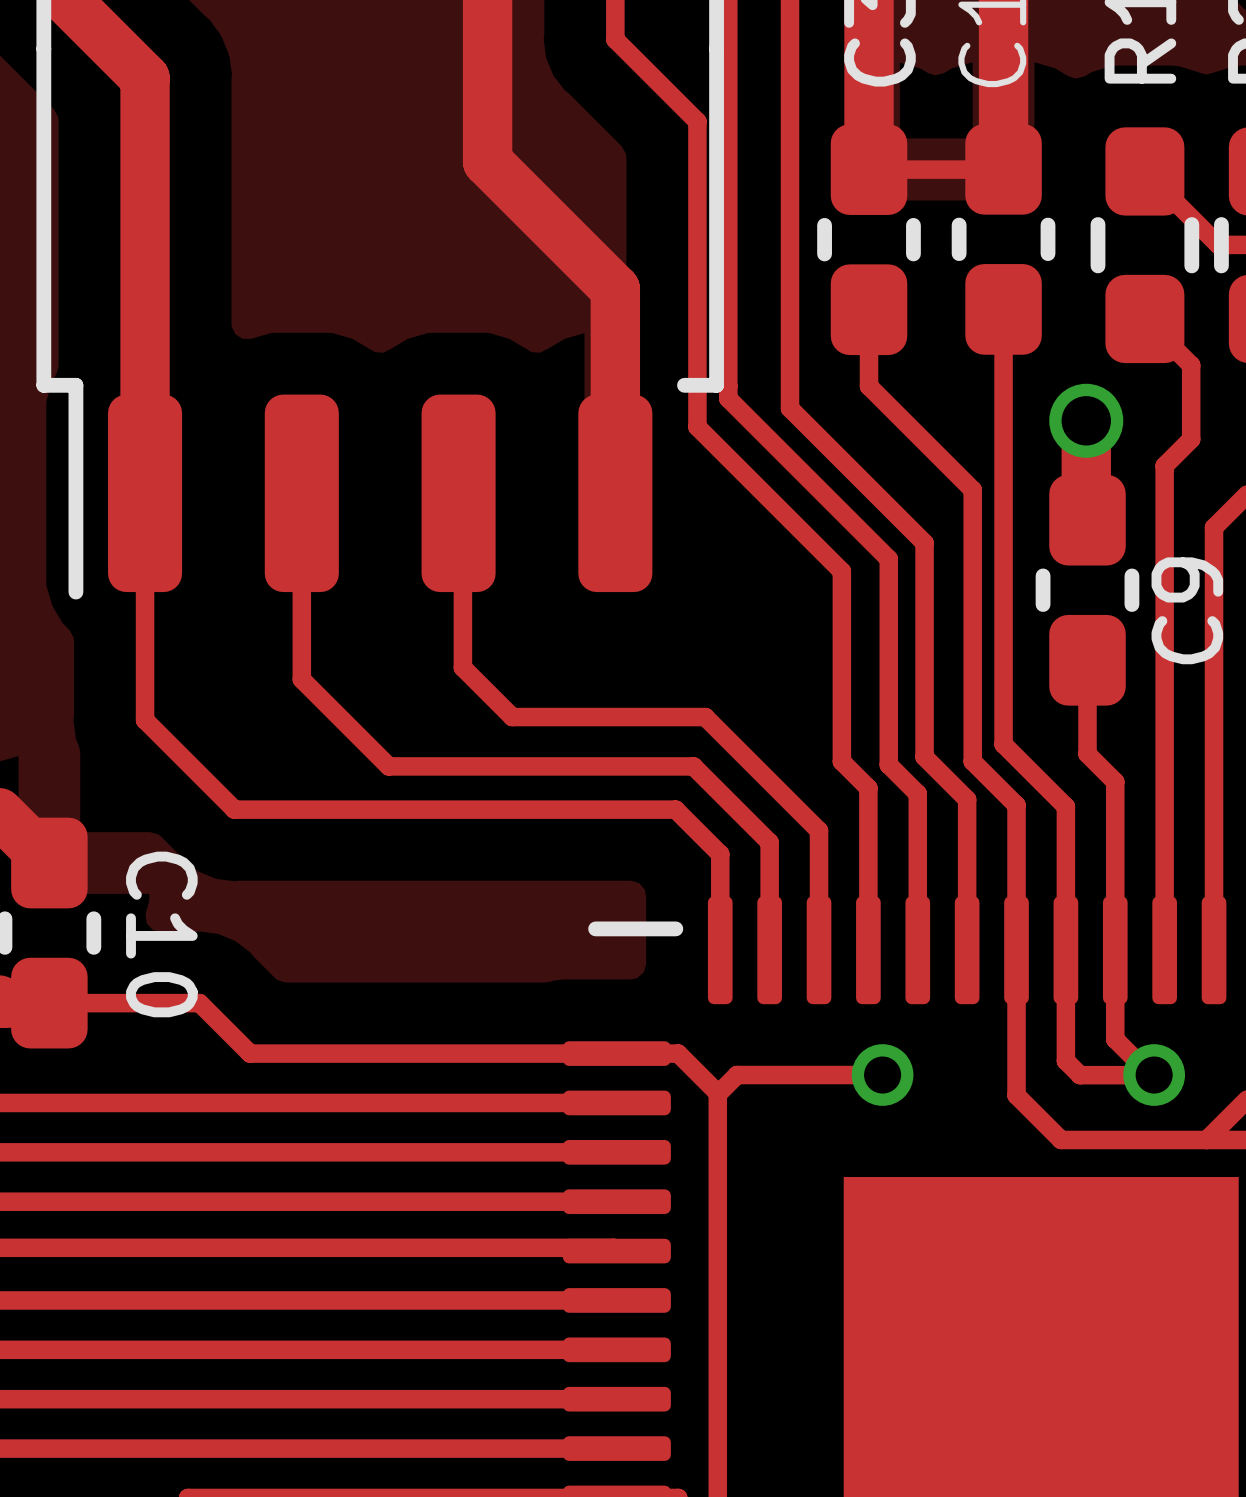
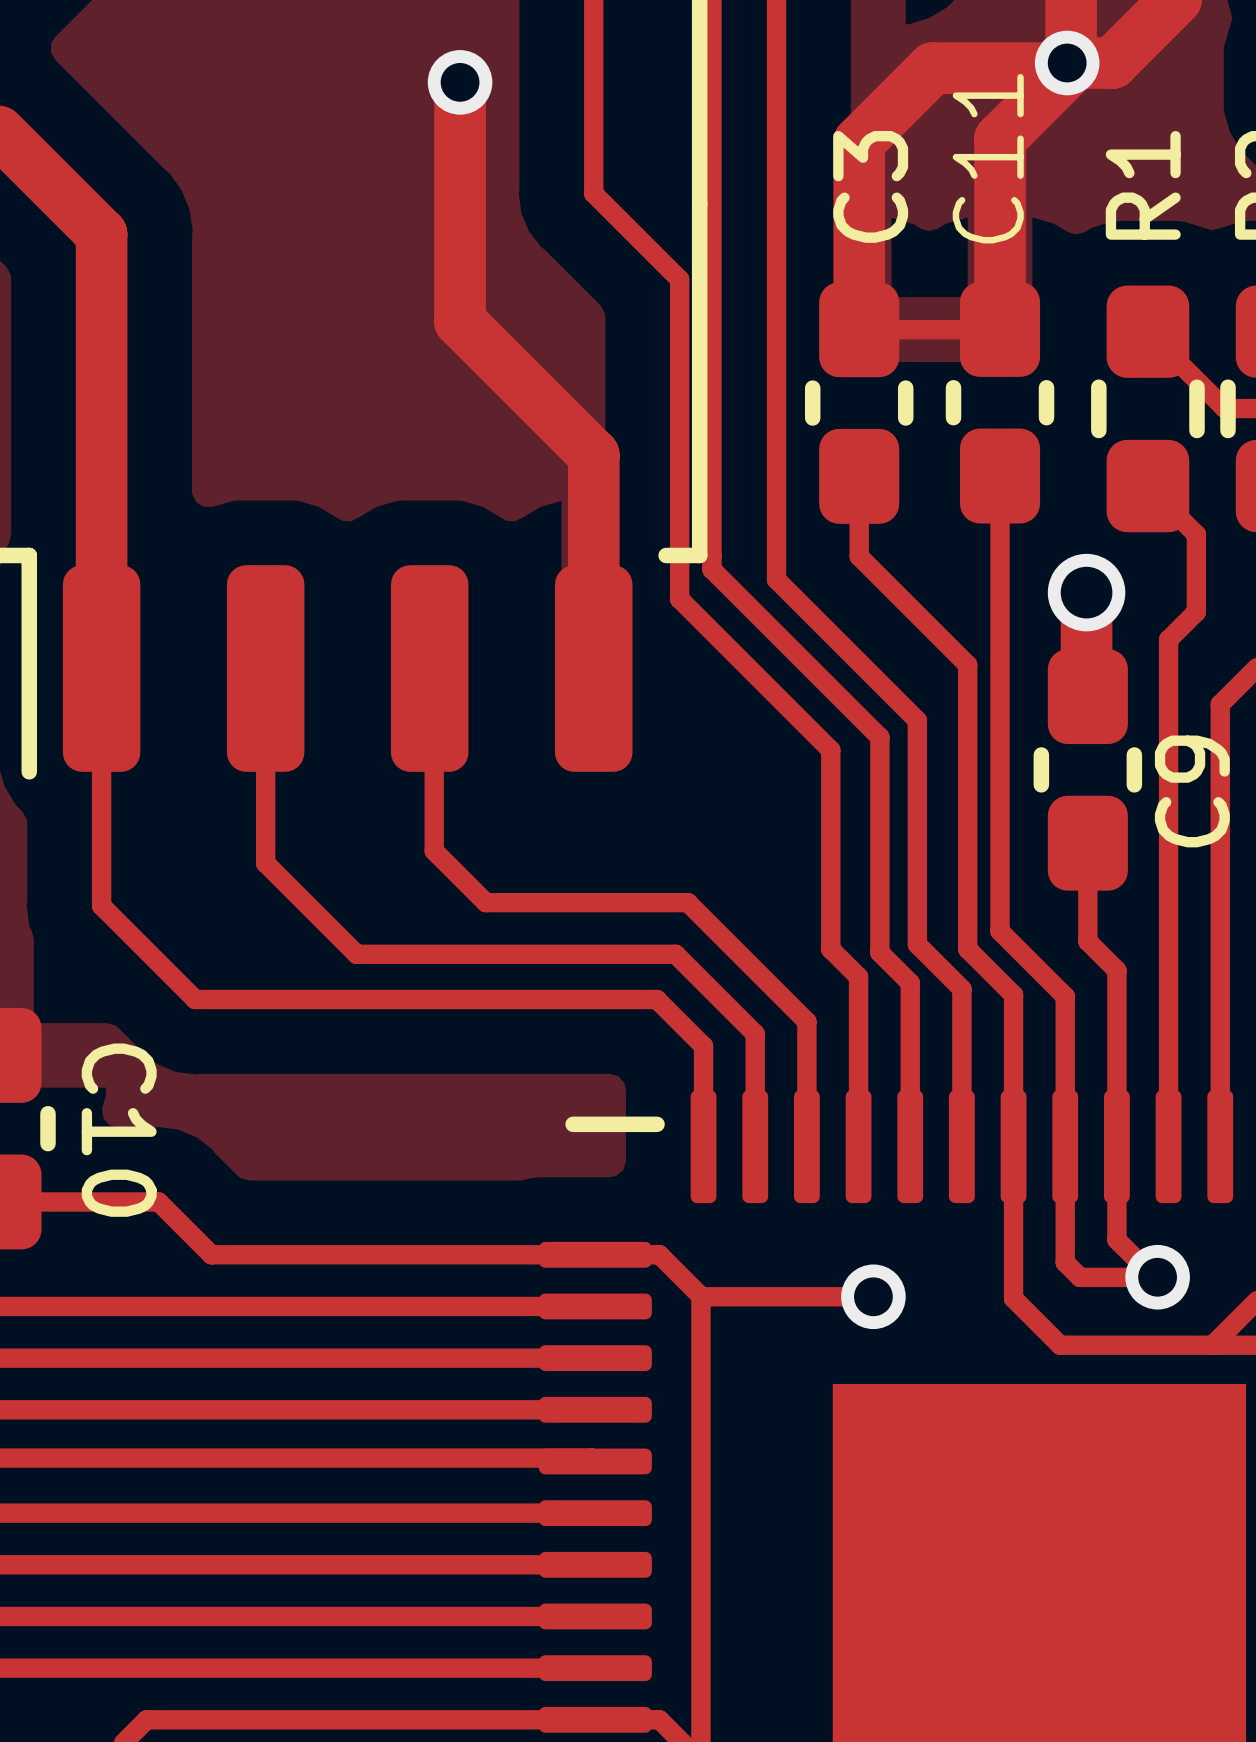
via position: (882, 1075) -> (873, 1296)
track: (718, 1093) (737, 1075) (882, 1075) (882, 1093) -> (701, 1296) (873, 1296)

